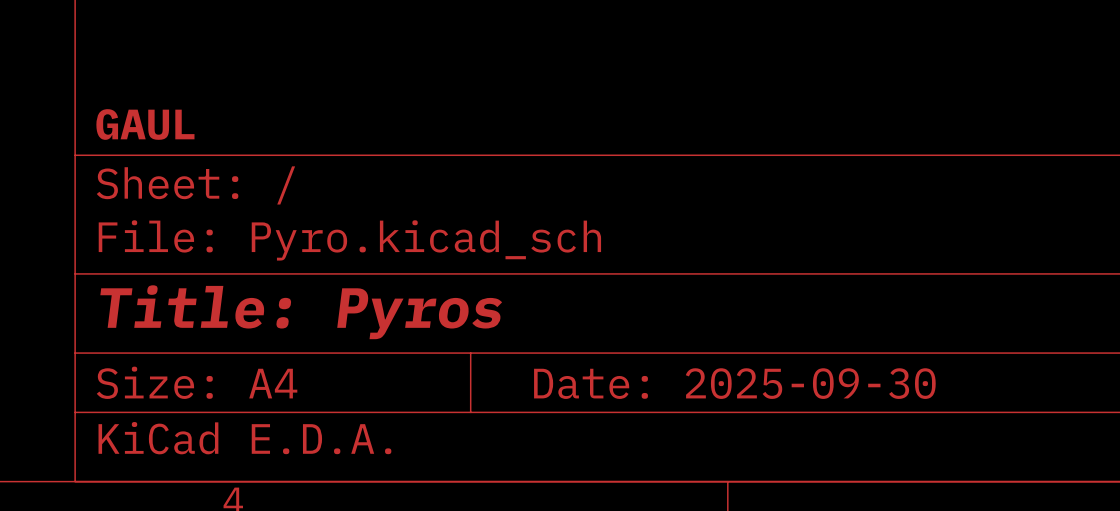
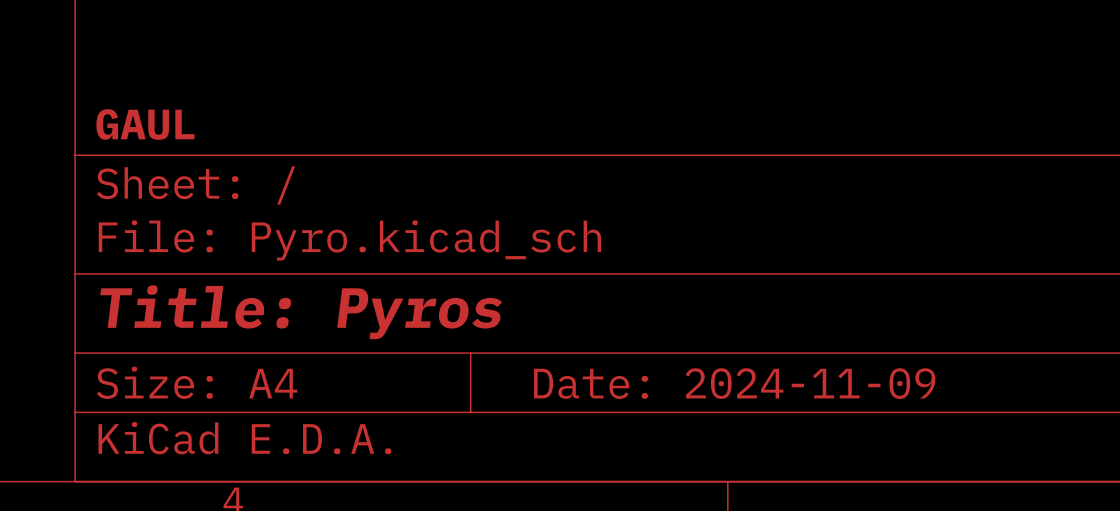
title block: Date: 2025-09-30 (734, 383) -> Date: 2024-11-09 (734, 383)

